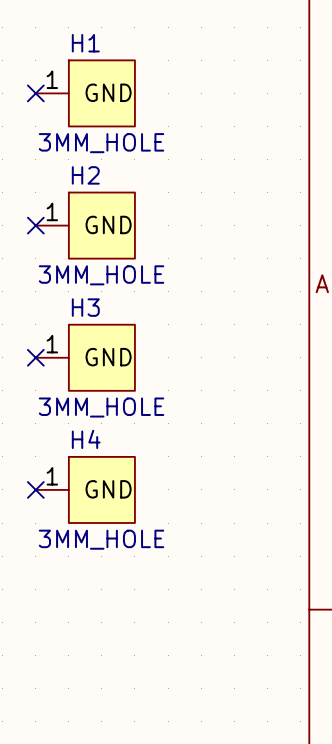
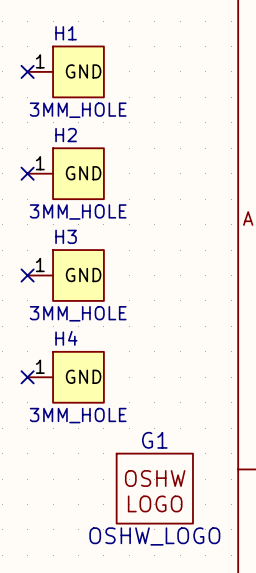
G1: none -> OSHW_LOGO (154, 488)

